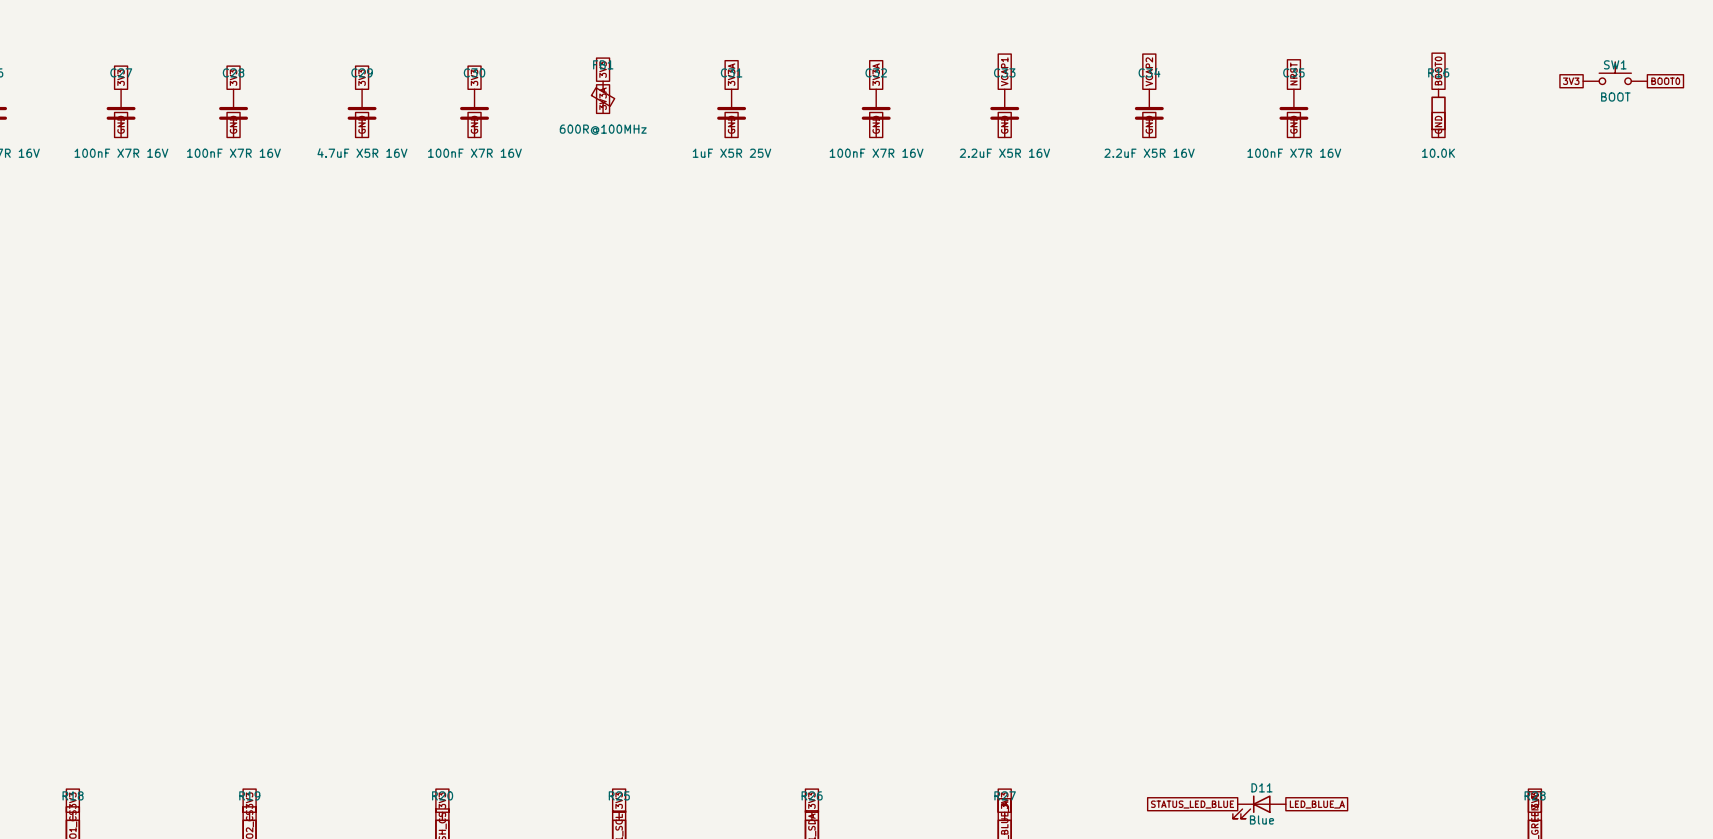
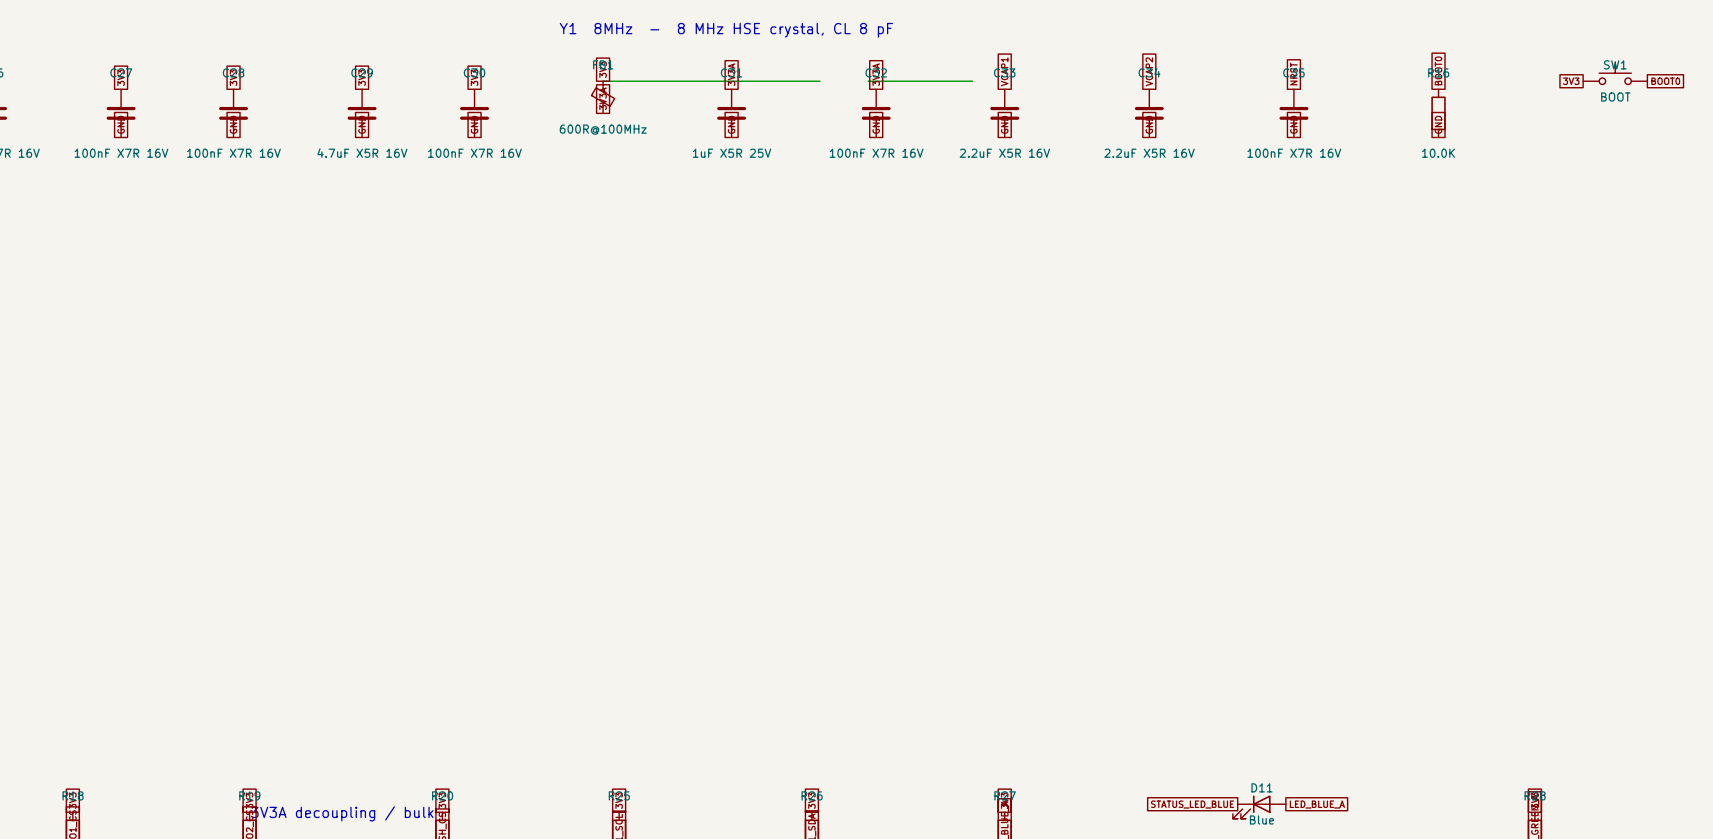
text: none -> Y1 8MHz - 8 MHz HSE crystal, CL 8 pF (726, 30)
wire: none -> (603, 81) (819, 81)
wire: none -> (868, 81) (972, 81)
text: none -> 3V3A decoupling / bulk (342, 813)

